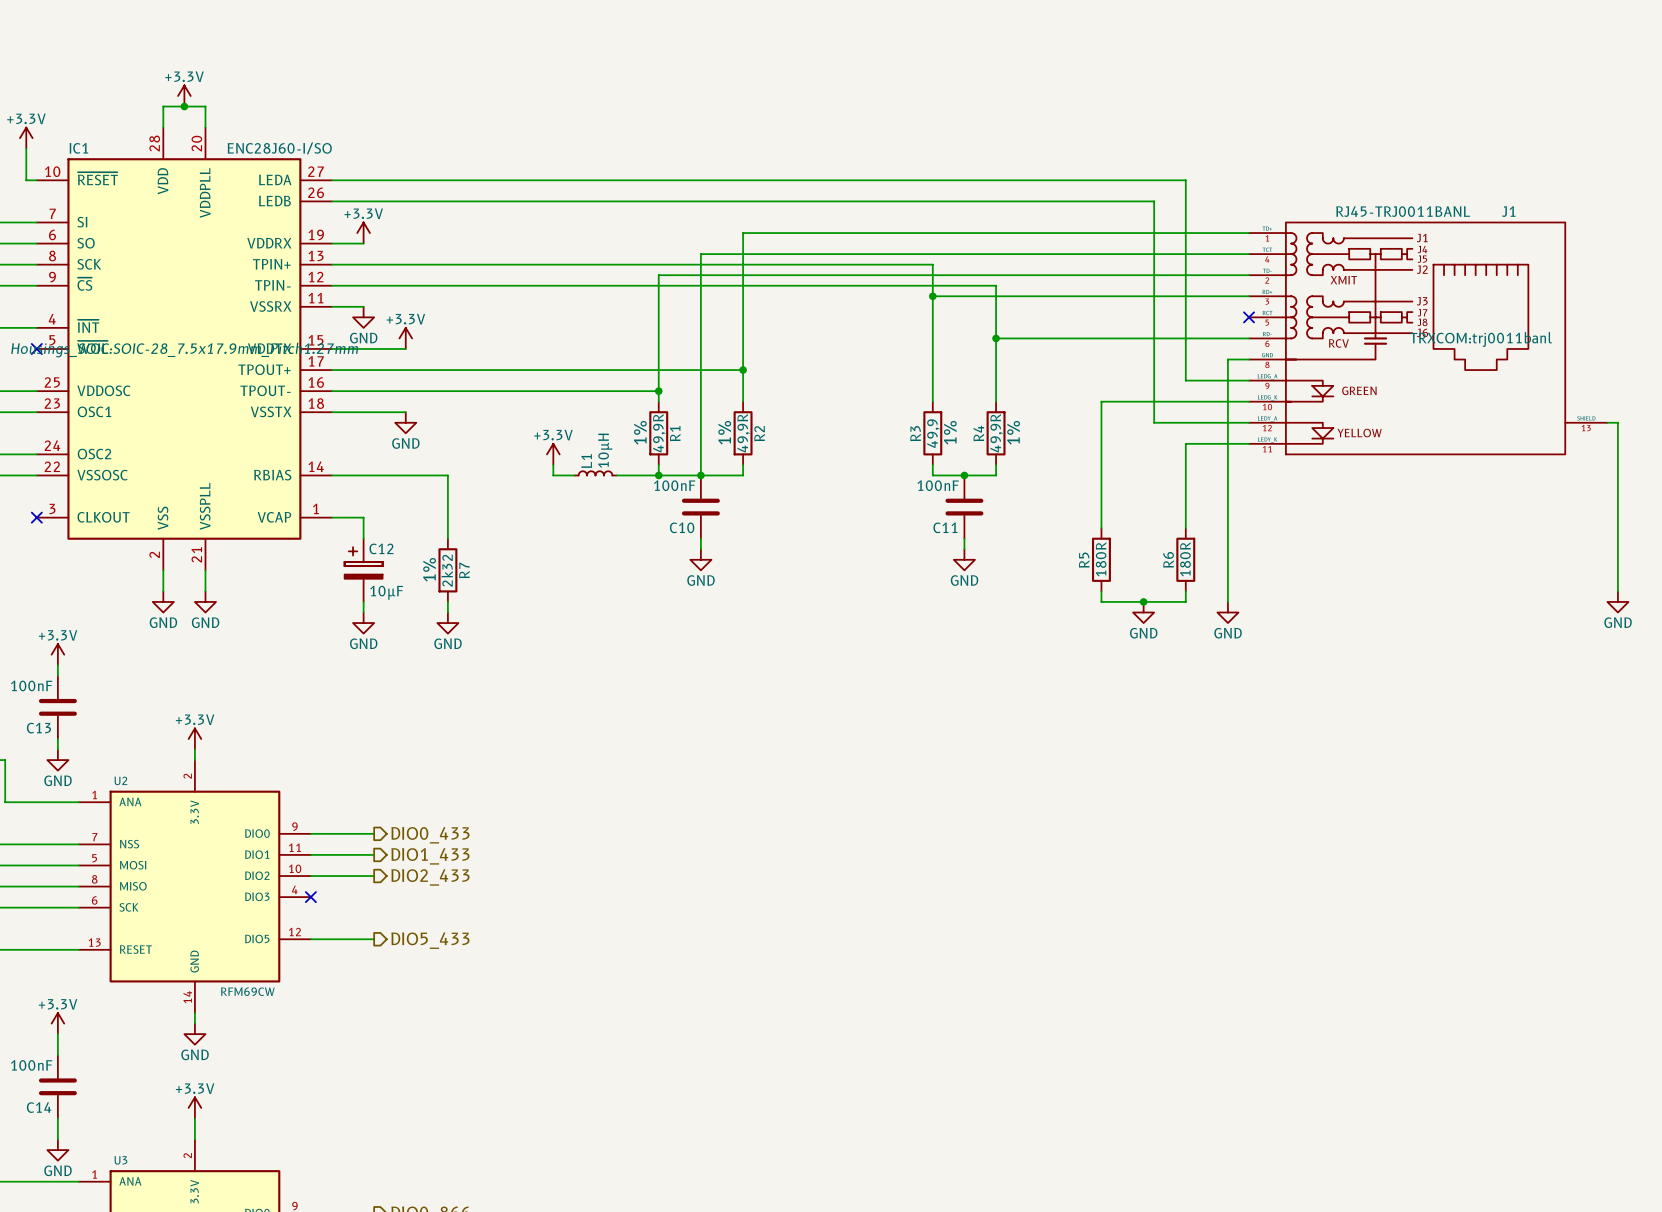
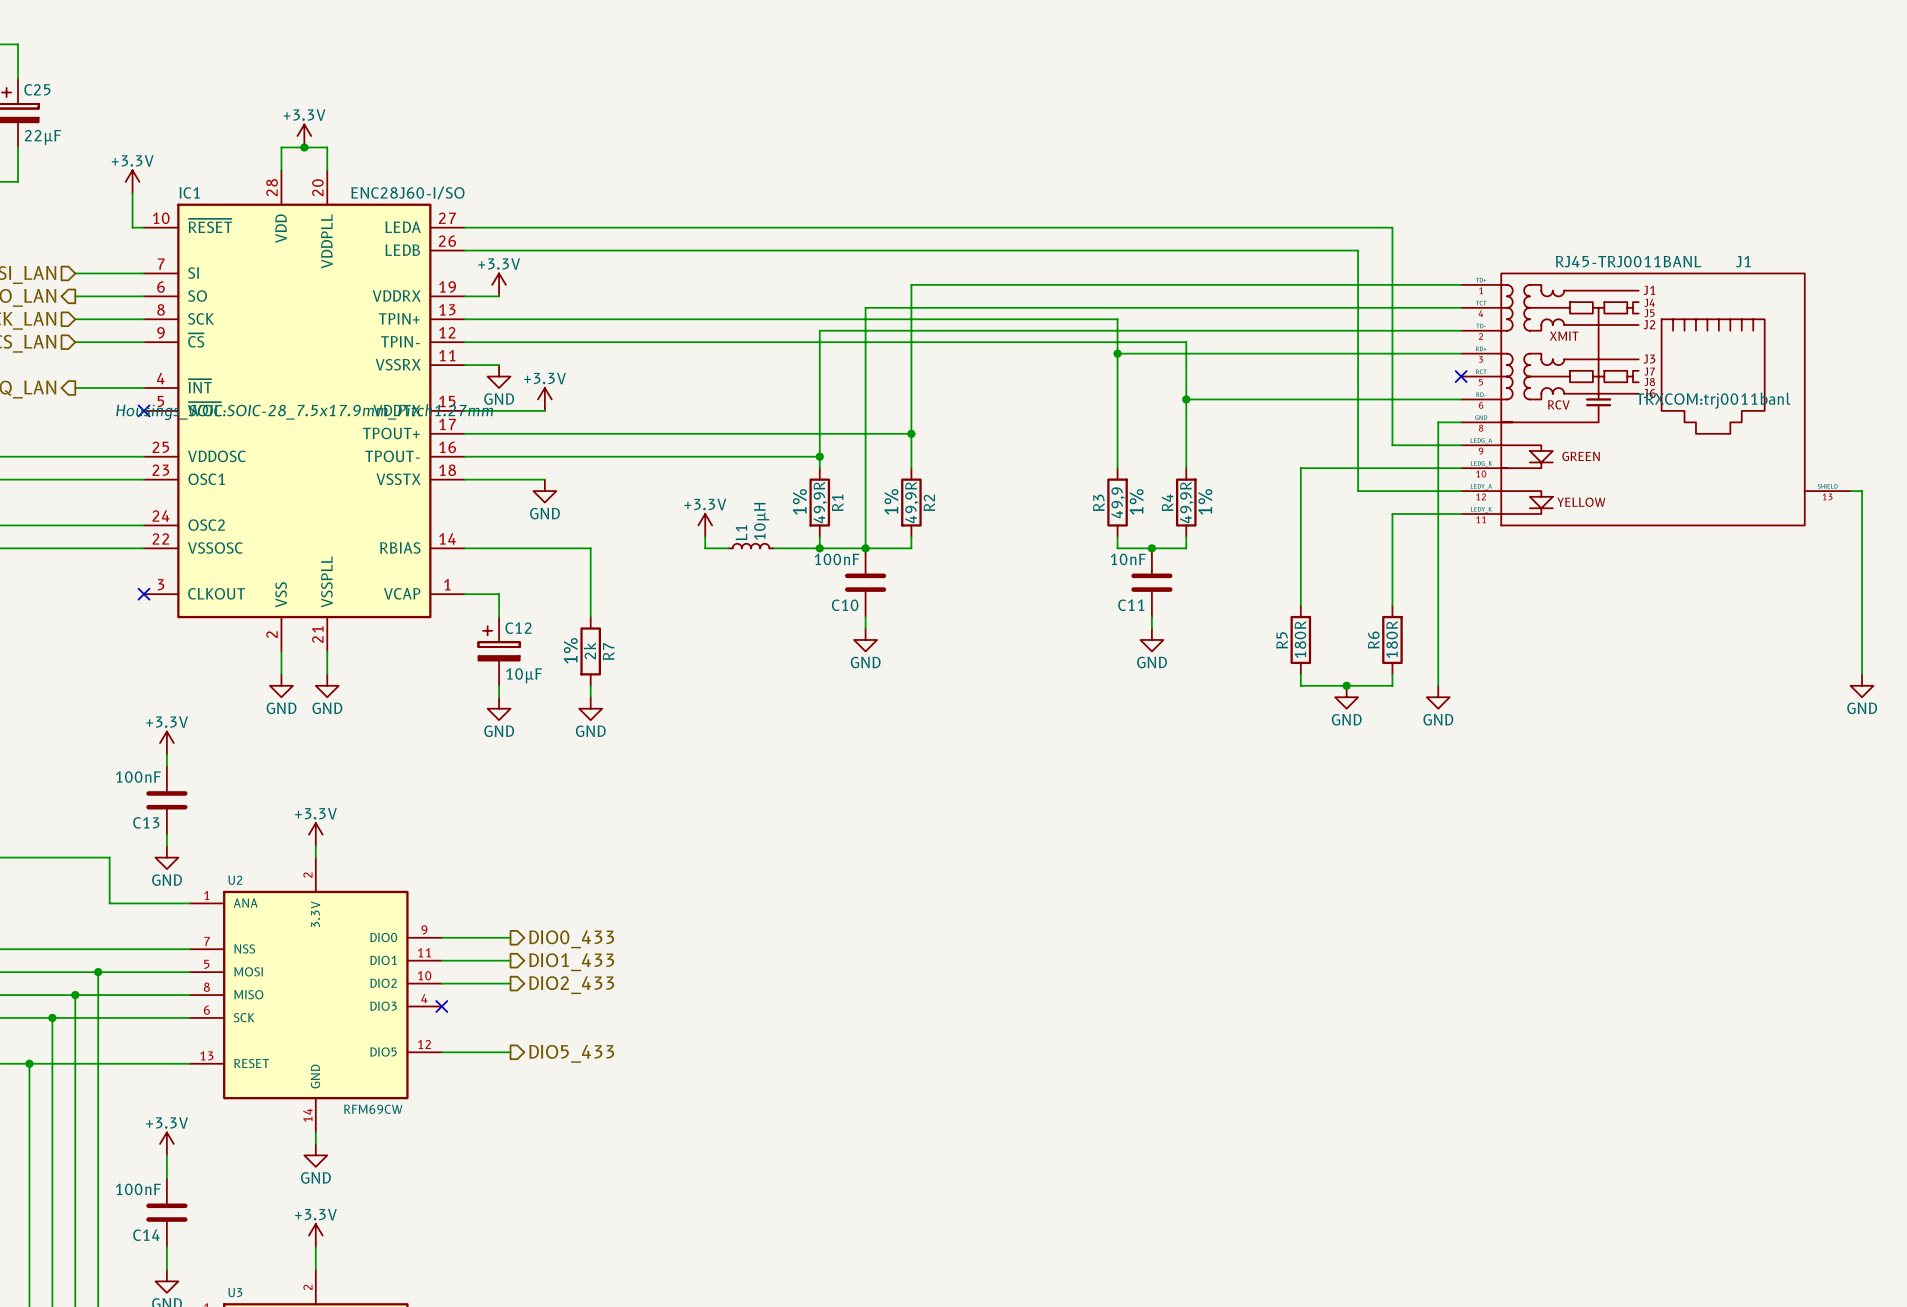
C11 value: 100nF (938, 485) -> 10nF (1128, 559)
R7 value: 2k32 (447, 570) -> 2k (589, 650)

